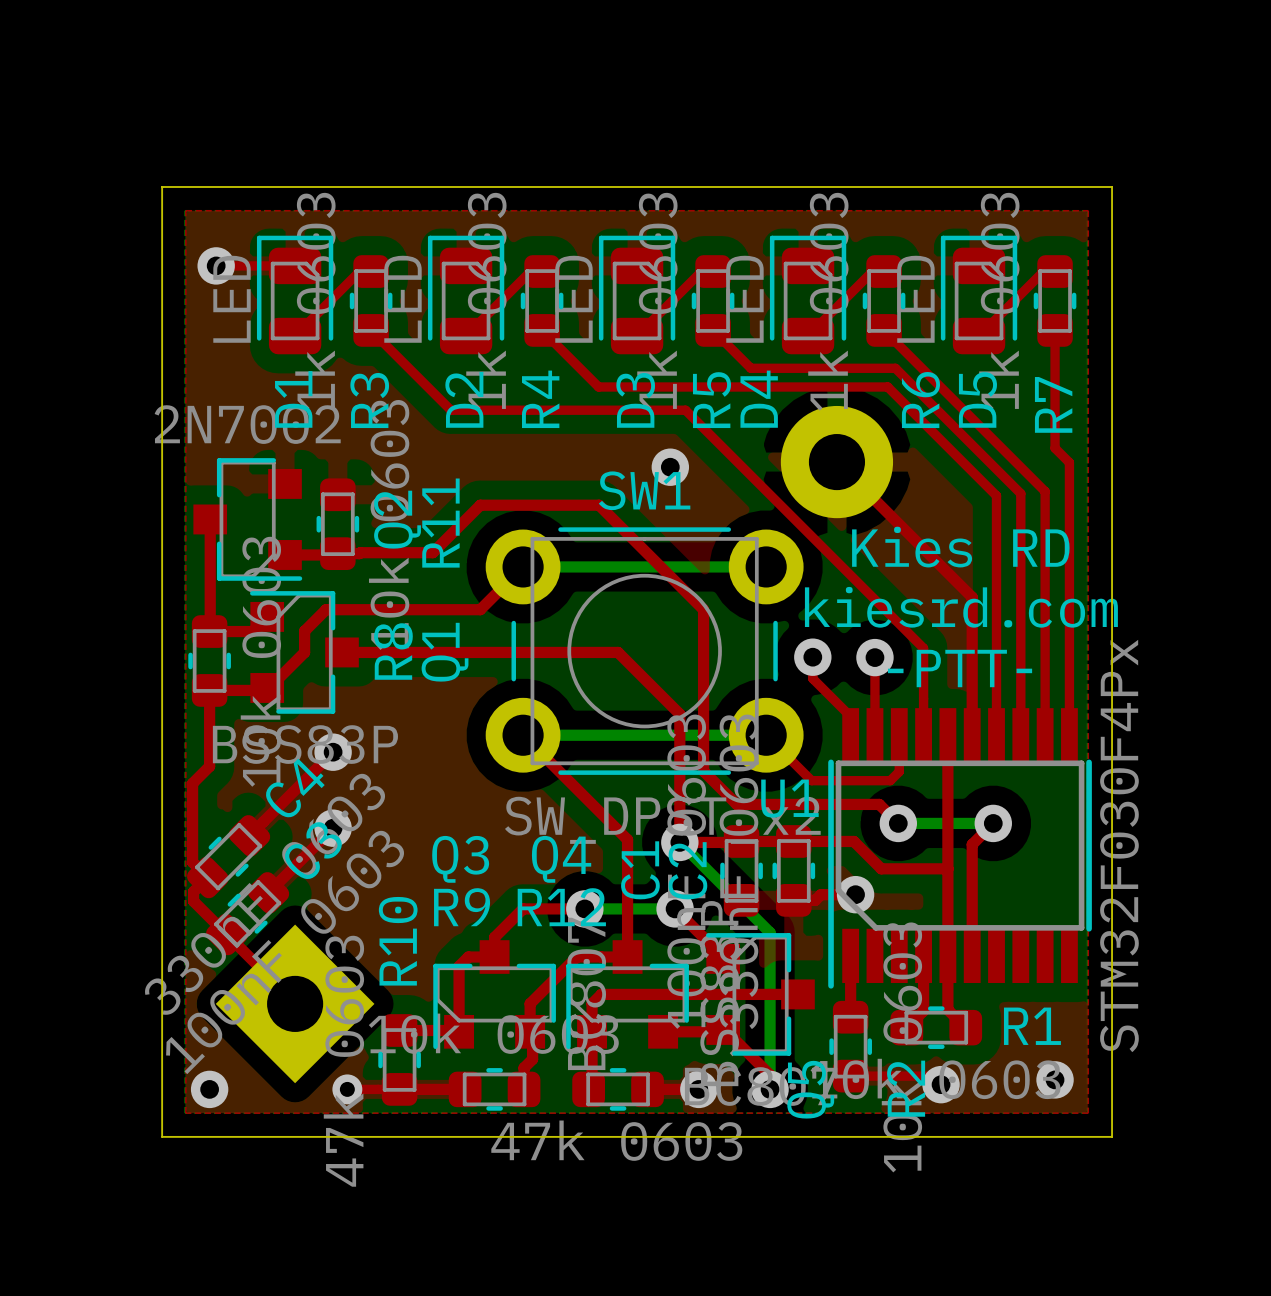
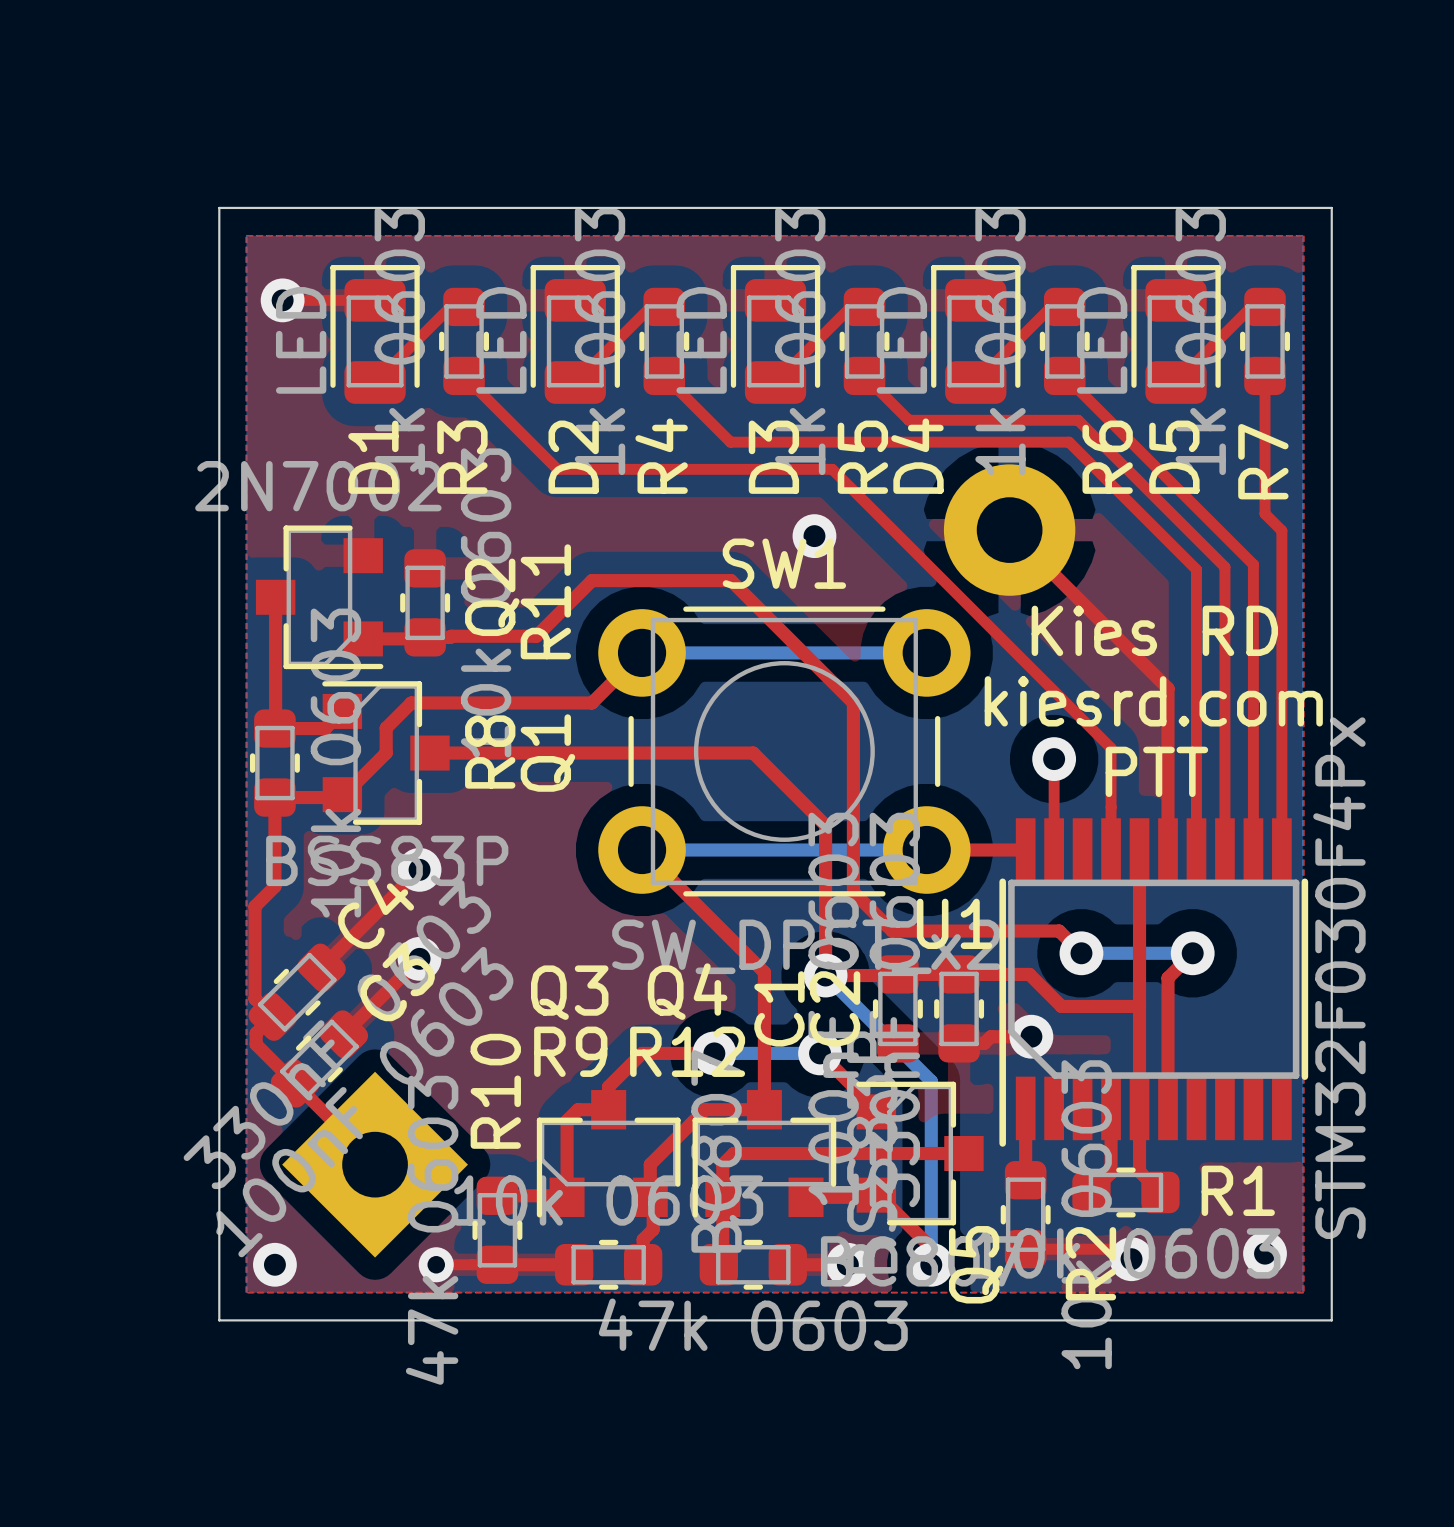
top track: (812, 657) (812, 678) (850, 716) (850, 735) -> none
via: (812, 657) -> none
text: -PTT- (960, 668) -> PTT (1156, 771)
top track: (766, 735) (811, 780) (890, 780) (899, 771) (899, 735) -> (926, 850) (1025, 850)

